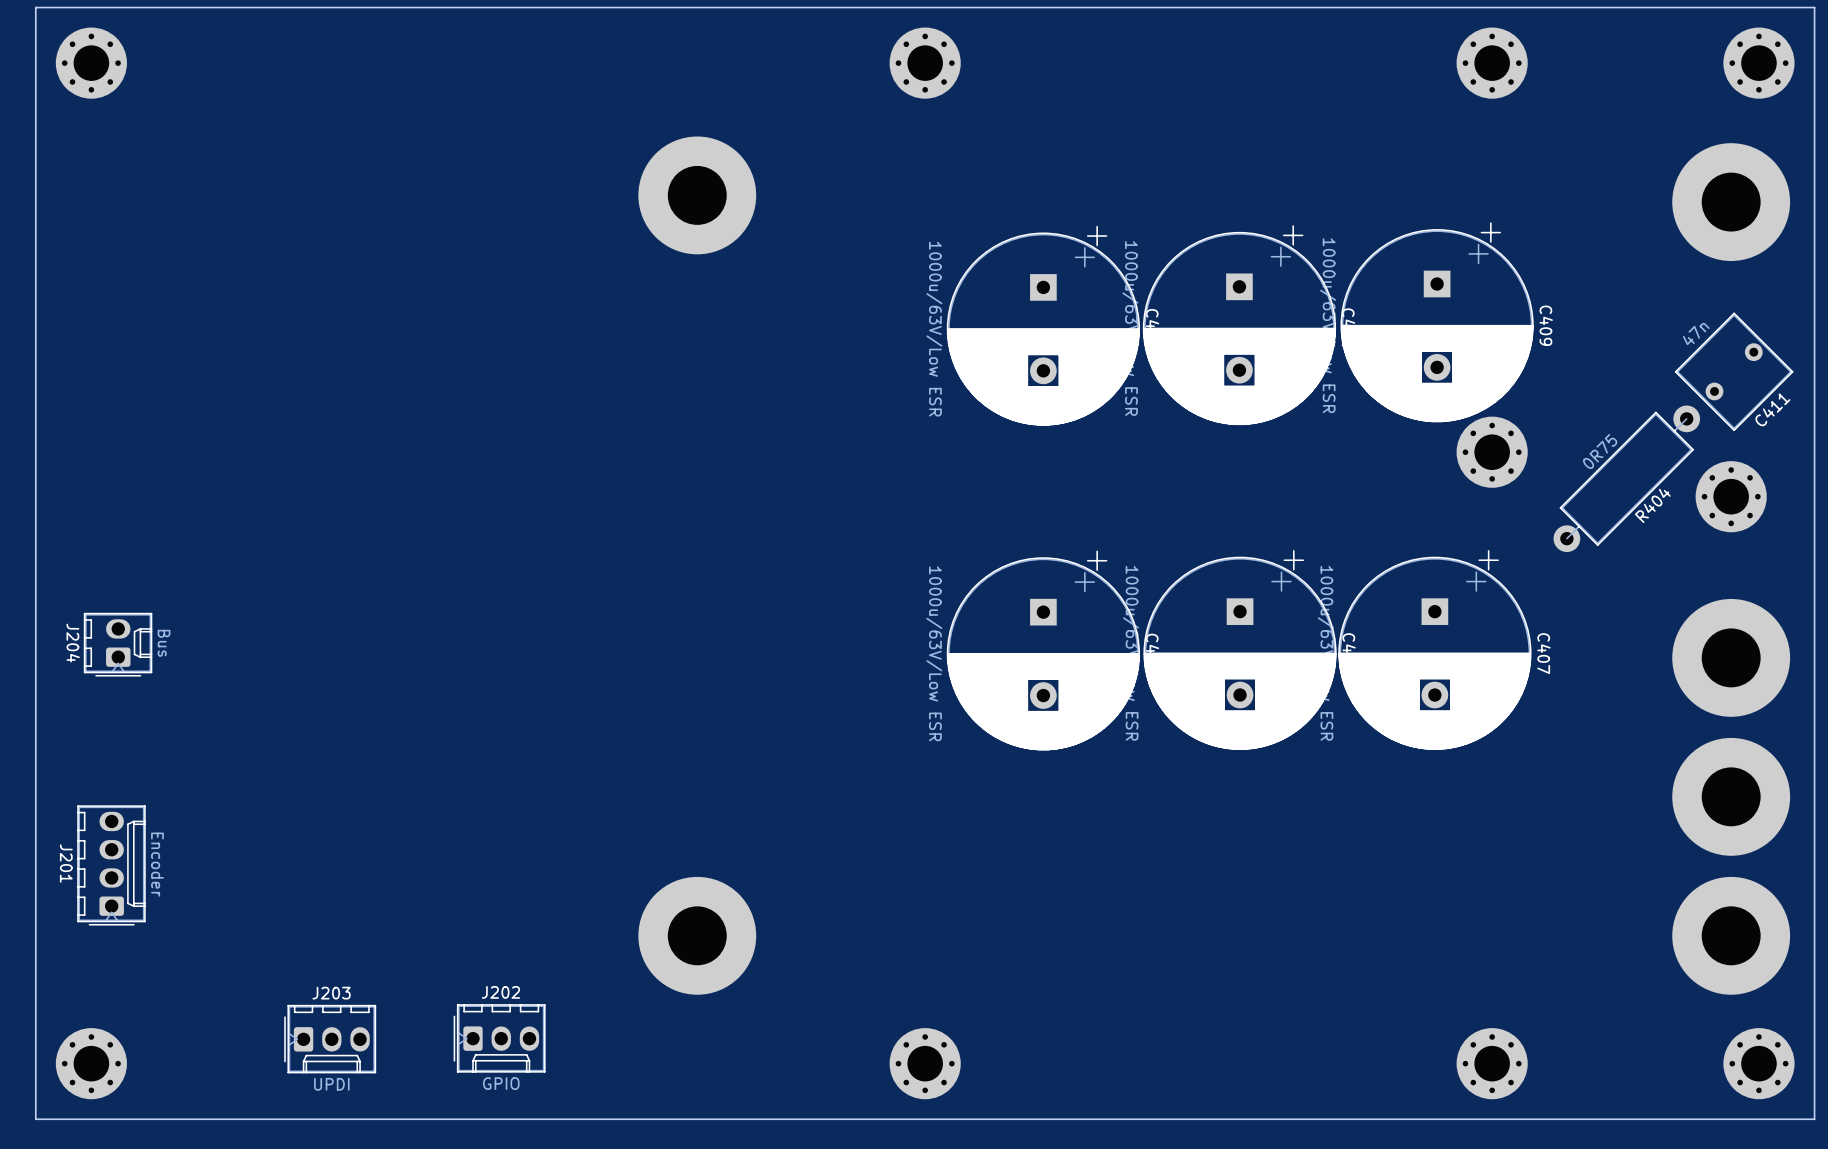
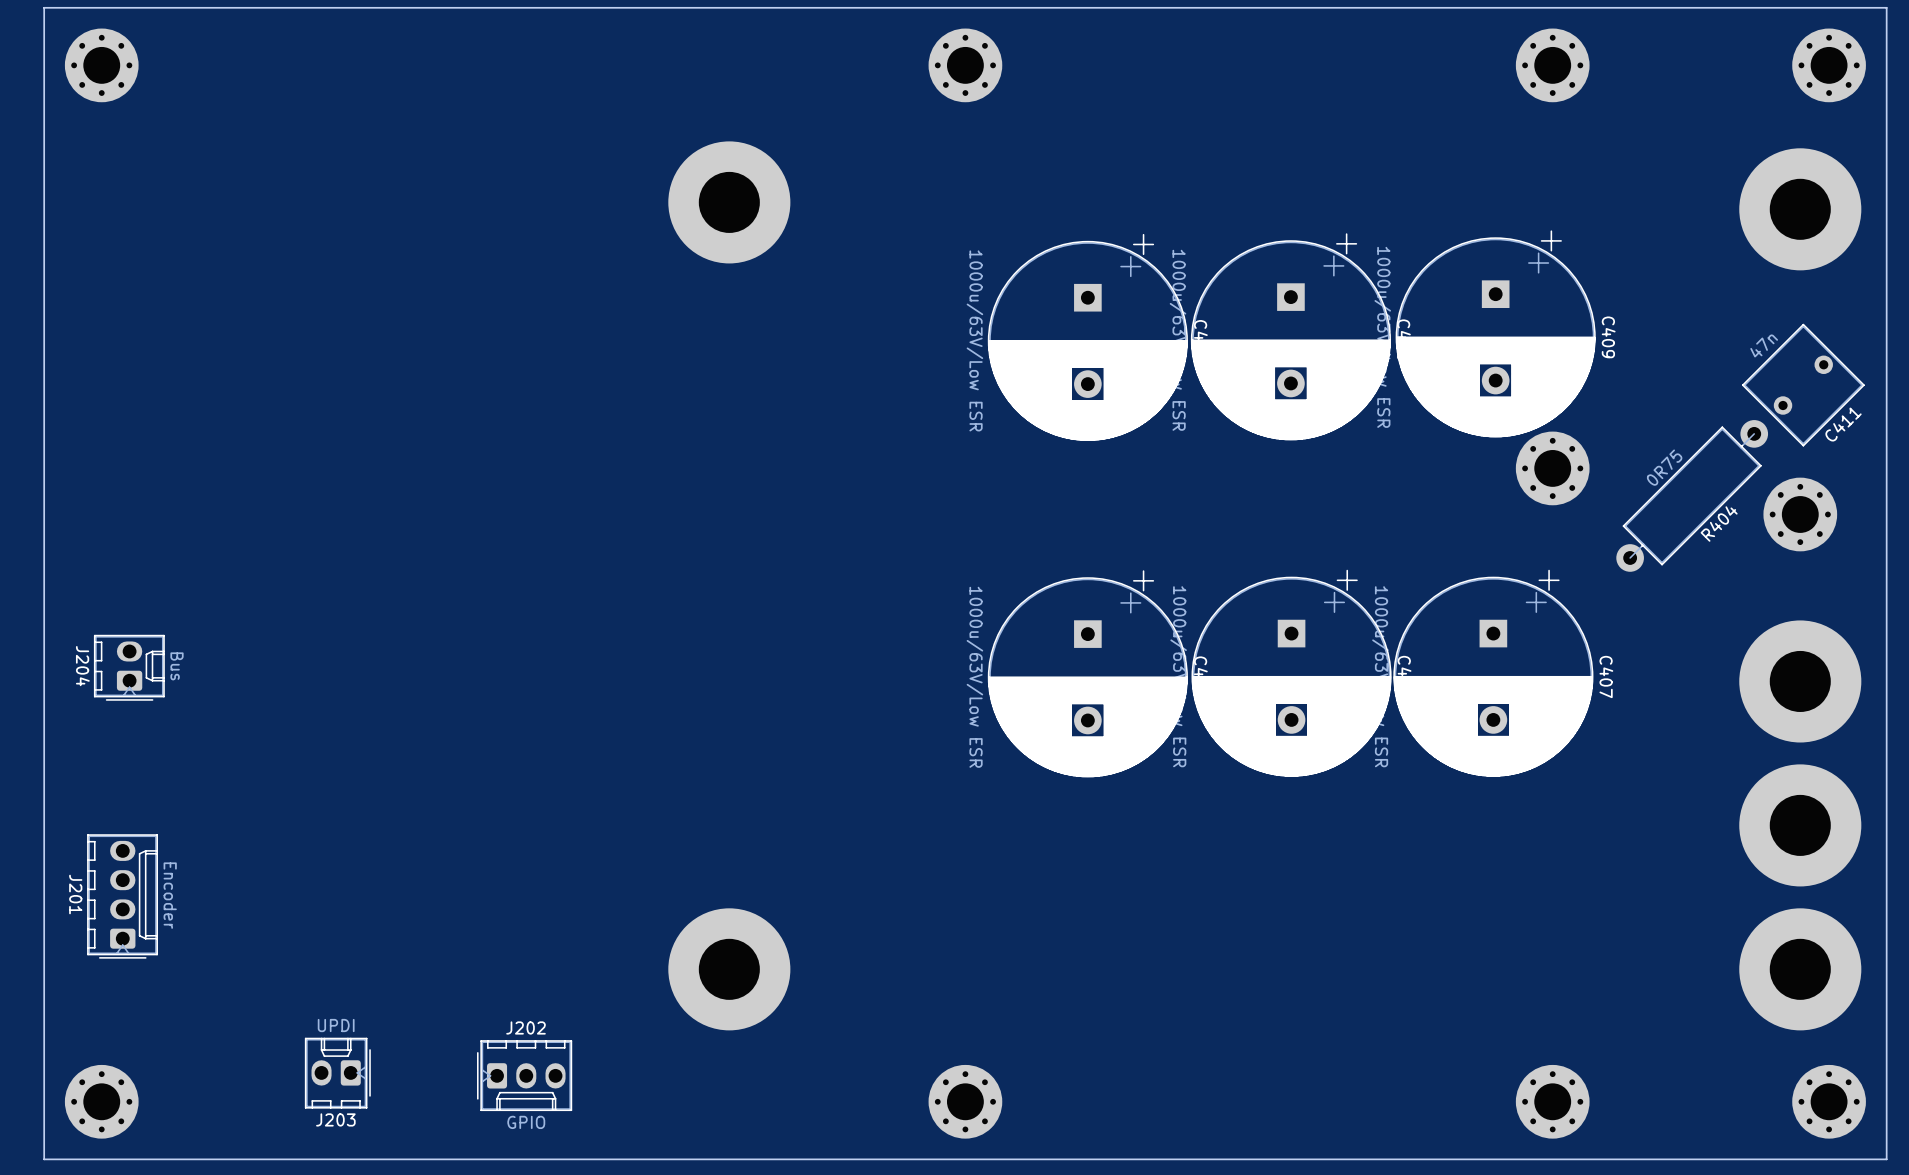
J203 name position: J203 (331, 993) -> J203 (335, 1119)
J203 footprint: [284, 1004, 377, 1074] -> [304, 1037, 371, 1109]
J203 value position: UPDI (331, 1084) -> UPDI (336, 1025)

